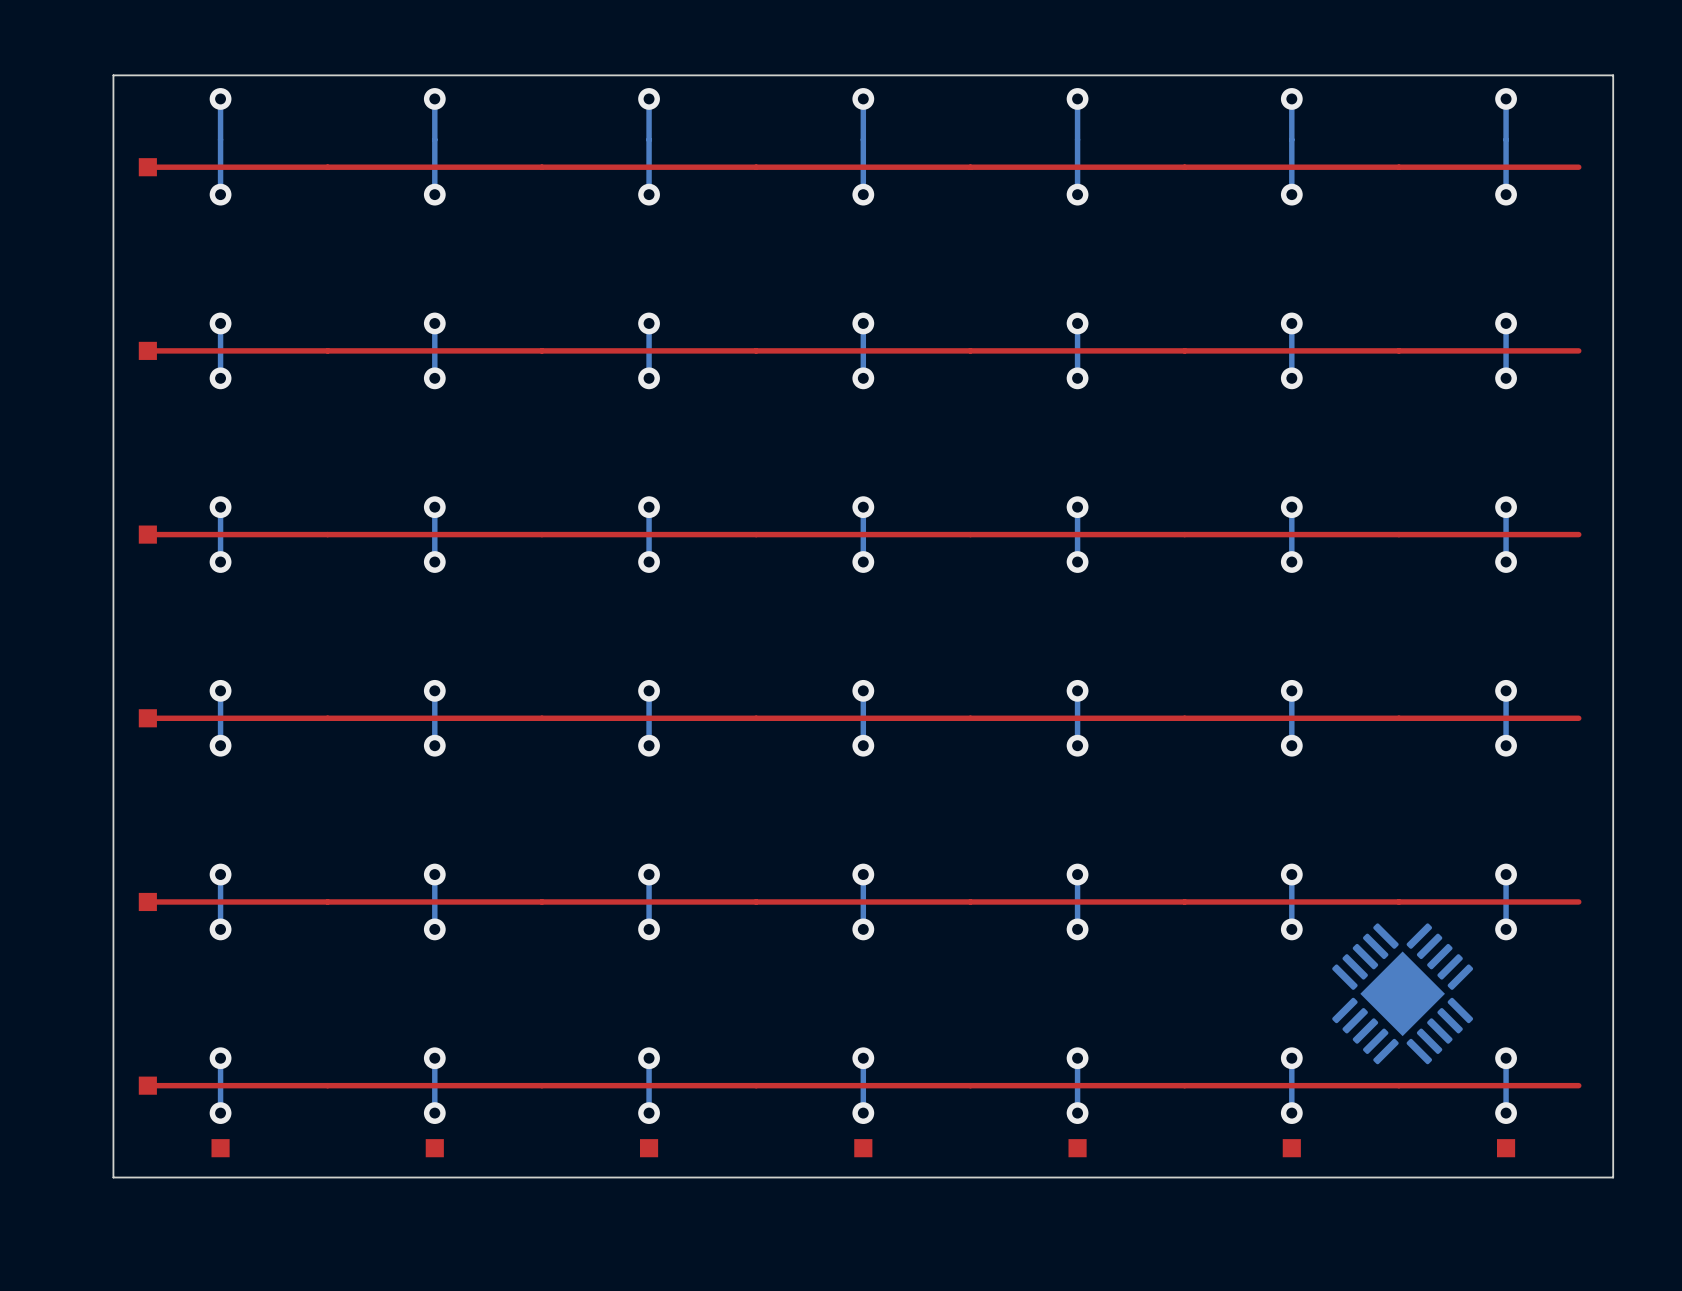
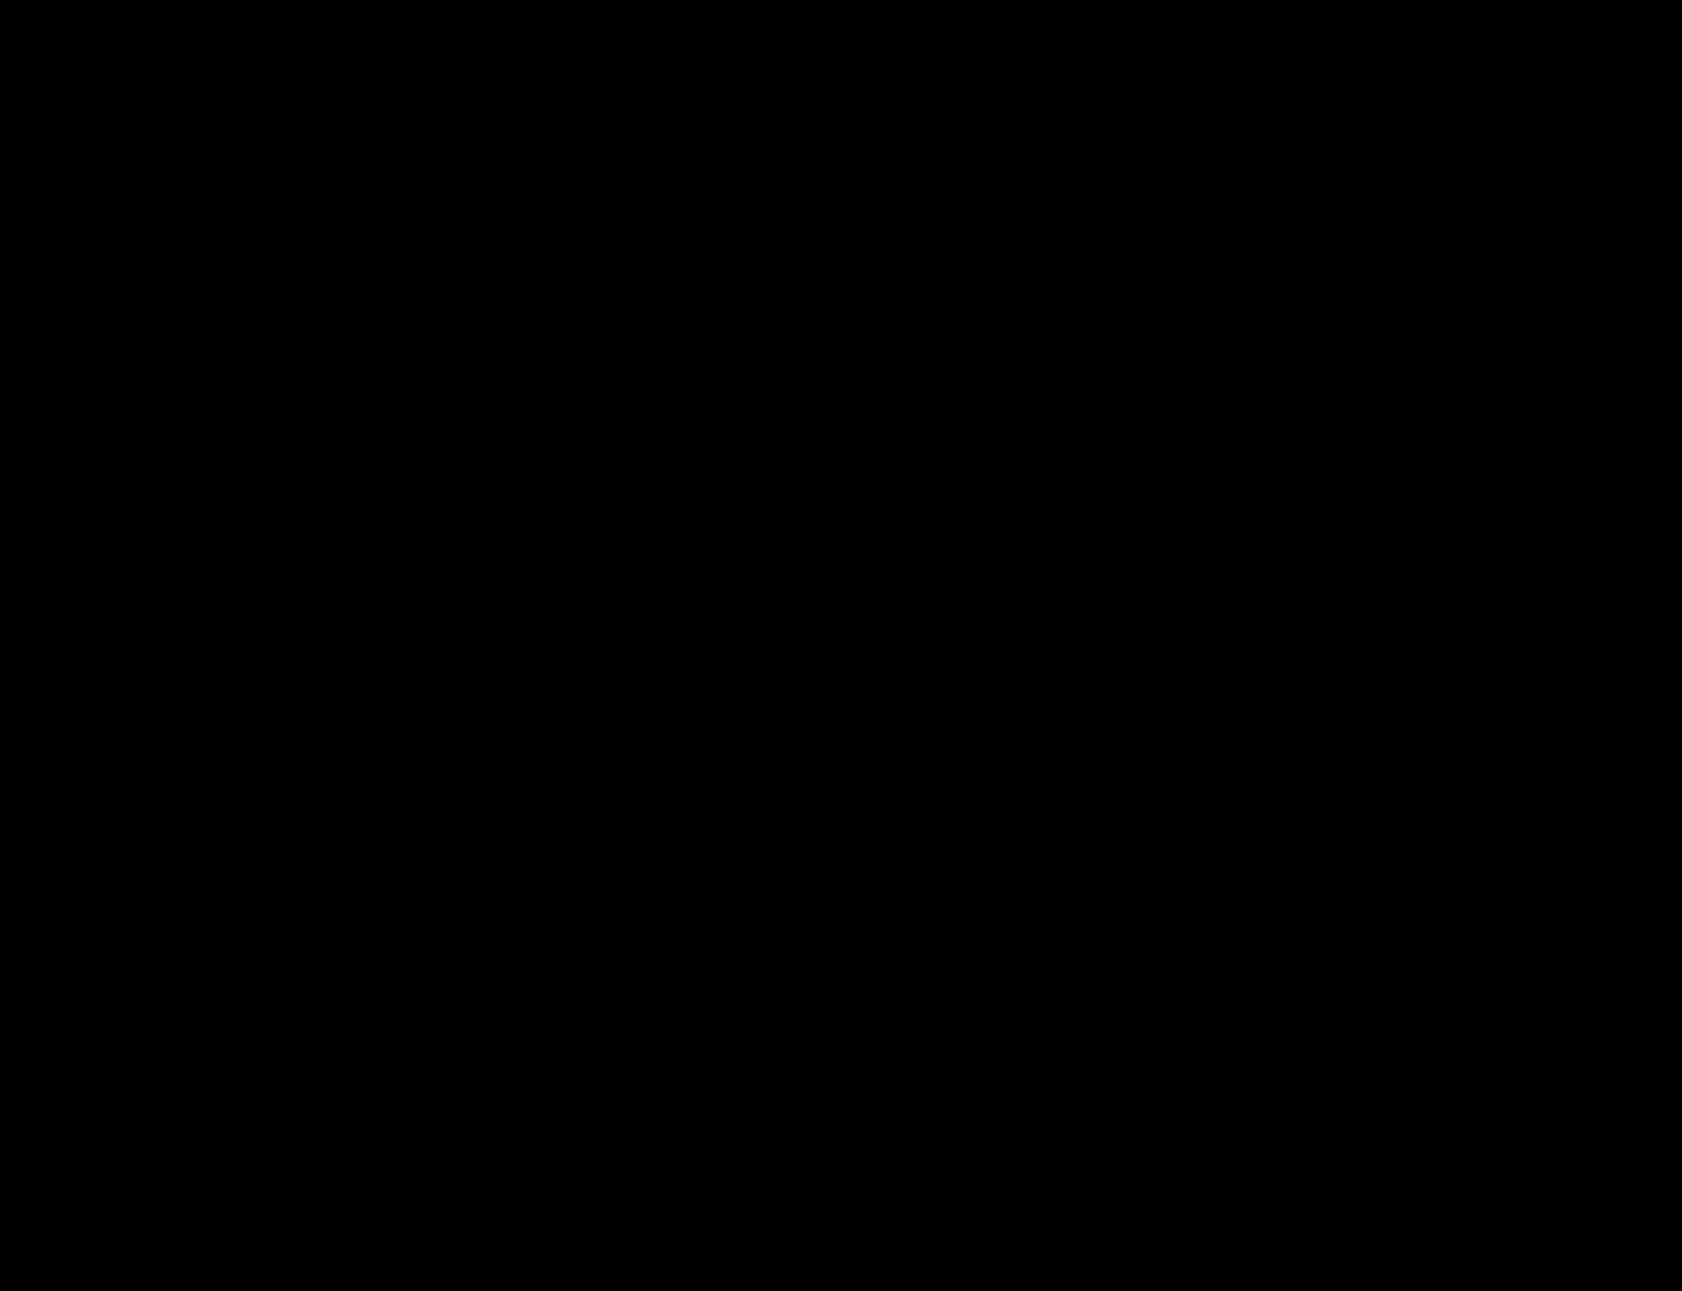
board edge: (113, 75) (1613, 75) (1613, 1177) (113, 1177) (113, 75) -> none
bottom track: (220, 98) (220, 194) -> none
via: (220, 98) -> none
bottom track: (434, 98) (434, 194) -> none
via: (434, 98) -> none
bottom track: (649, 98) (649, 194) -> none
via: (649, 98) -> none
bottom track: (863, 98) (863, 194) -> none
via: (863, 98) -> none
bottom track: (1077, 98) (1077, 194) -> none
via: (1077, 98) -> none
bottom track: (1291, 98) (1291, 194) -> none
via: (1291, 98) -> none
bottom track: (1506, 98) (1506, 194) -> none
via: (1506, 98) -> none
top track: (147, 167) (1578, 167) -> none
part: (147, 167) -> none
via: (220, 194) -> none
via: (434, 194) -> none
via: (649, 194) -> none
via: (863, 194) -> none
via: (1077, 194) -> none
via: (1291, 194) -> none
via: (1506, 194) -> none
bottom track: (220, 323) (220, 378) -> none
via: (220, 323) -> none
bottom track: (434, 323) (434, 378) -> none
via: (434, 323) -> none
bottom track: (649, 323) (649, 378) -> none
via: (649, 323) -> none
bottom track: (863, 323) (863, 378) -> none
via: (863, 323) -> none
bottom track: (1077, 323) (1077, 378) -> none
via: (1077, 323) -> none
bottom track: (1291, 323) (1291, 378) -> none
via: (1291, 323) -> none
bottom track: (1506, 323) (1506, 378) -> none
via: (1506, 323) -> none
top track: (147, 350) (1578, 350) -> none
part: (147, 350) -> none
via: (220, 378) -> none
via: (434, 378) -> none
via: (649, 378) -> none
via: (863, 378) -> none
via: (1077, 378) -> none
via: (1291, 378) -> none
via: (1506, 378) -> none
bottom track: (220, 507) (220, 562) -> none
via: (220, 507) -> none
bottom track: (434, 507) (434, 562) -> none
via: (434, 507) -> none
bottom track: (649, 507) (649, 562) -> none
via: (649, 507) -> none
bottom track: (863, 507) (863, 562) -> none
via: (863, 507) -> none
bottom track: (1077, 507) (1077, 562) -> none
via: (1077, 507) -> none
bottom track: (1291, 507) (1291, 562) -> none
via: (1291, 507) -> none
bottom track: (1506, 507) (1506, 562) -> none
via: (1506, 507) -> none
top track: (147, 534) (1578, 534) -> none
part: (147, 534) -> none
via: (220, 562) -> none
via: (434, 562) -> none
via: (649, 562) -> none
via: (863, 562) -> none
via: (1077, 562) -> none
via: (1291, 562) -> none
via: (1506, 562) -> none
bottom track: (220, 690) (220, 745) -> none
via: (220, 690) -> none
bottom track: (434, 690) (434, 745) -> none
via: (434, 690) -> none
bottom track: (649, 690) (649, 745) -> none
via: (649, 690) -> none
bottom track: (863, 690) (863, 745) -> none
via: (863, 690) -> none
bottom track: (1077, 690) (1077, 745) -> none
via: (1077, 690) -> none
bottom track: (1291, 690) (1291, 745) -> none
via: (1291, 690) -> none
bottom track: (1506, 690) (1506, 745) -> none
via: (1506, 690) -> none
top track: (147, 718) (1578, 718) -> none
part: (147, 718) -> none
via: (220, 745) -> none
via: (434, 745) -> none
via: (649, 745) -> none
via: (863, 745) -> none
via: (1077, 745) -> none
via: (1291, 745) -> none
via: (1506, 745) -> none
bottom track: (220, 874) (220, 929) -> none
via: (220, 874) -> none
bottom track: (434, 874) (434, 929) -> none
via: (434, 874) -> none
bottom track: (649, 874) (649, 929) -> none
via: (649, 874) -> none
bottom track: (863, 874) (863, 929) -> none
via: (863, 874) -> none
bottom track: (1077, 874) (1077, 929) -> none
via: (1077, 874) -> none
bottom track: (1291, 874) (1291, 929) -> none
via: (1291, 874) -> none
bottom track: (1506, 874) (1506, 929) -> none
via: (1506, 874) -> none
top track: (147, 901) (1578, 901) -> none
part: (147, 901) -> none
via: (220, 929) -> none
via: (434, 929) -> none
via: (649, 929) -> none
via: (863, 929) -> none
via: (1077, 929) -> none
via: (1291, 929) -> none
via: (1506, 929) -> none
part: (1402, 993) -> none
bottom track: (220, 1058) (220, 1113) -> none
via: (220, 1058) -> none
bottom track: (434, 1058) (434, 1113) -> none
via: (434, 1058) -> none
bottom track: (649, 1058) (649, 1113) -> none
via: (649, 1058) -> none
bottom track: (863, 1058) (863, 1113) -> none
via: (863, 1058) -> none
bottom track: (1077, 1058) (1077, 1113) -> none
via: (1077, 1058) -> none
bottom track: (1291, 1058) (1291, 1113) -> none
via: (1291, 1058) -> none
bottom track: (1506, 1058) (1506, 1113) -> none
via: (1506, 1058) -> none
top track: (147, 1085) (1578, 1085) -> none
part: (147, 1085) -> none
via: (220, 1113) -> none
via: (434, 1113) -> none
via: (649, 1113) -> none
via: (863, 1113) -> none
via: (1077, 1113) -> none
via: (1291, 1113) -> none
via: (1506, 1113) -> none
part: (220, 1148) -> none
part: (434, 1148) -> none
part: (649, 1148) -> none
part: (863, 1148) -> none
part: (1077, 1148) -> none
part: (1291, 1148) -> none
part: (1506, 1148) -> none

